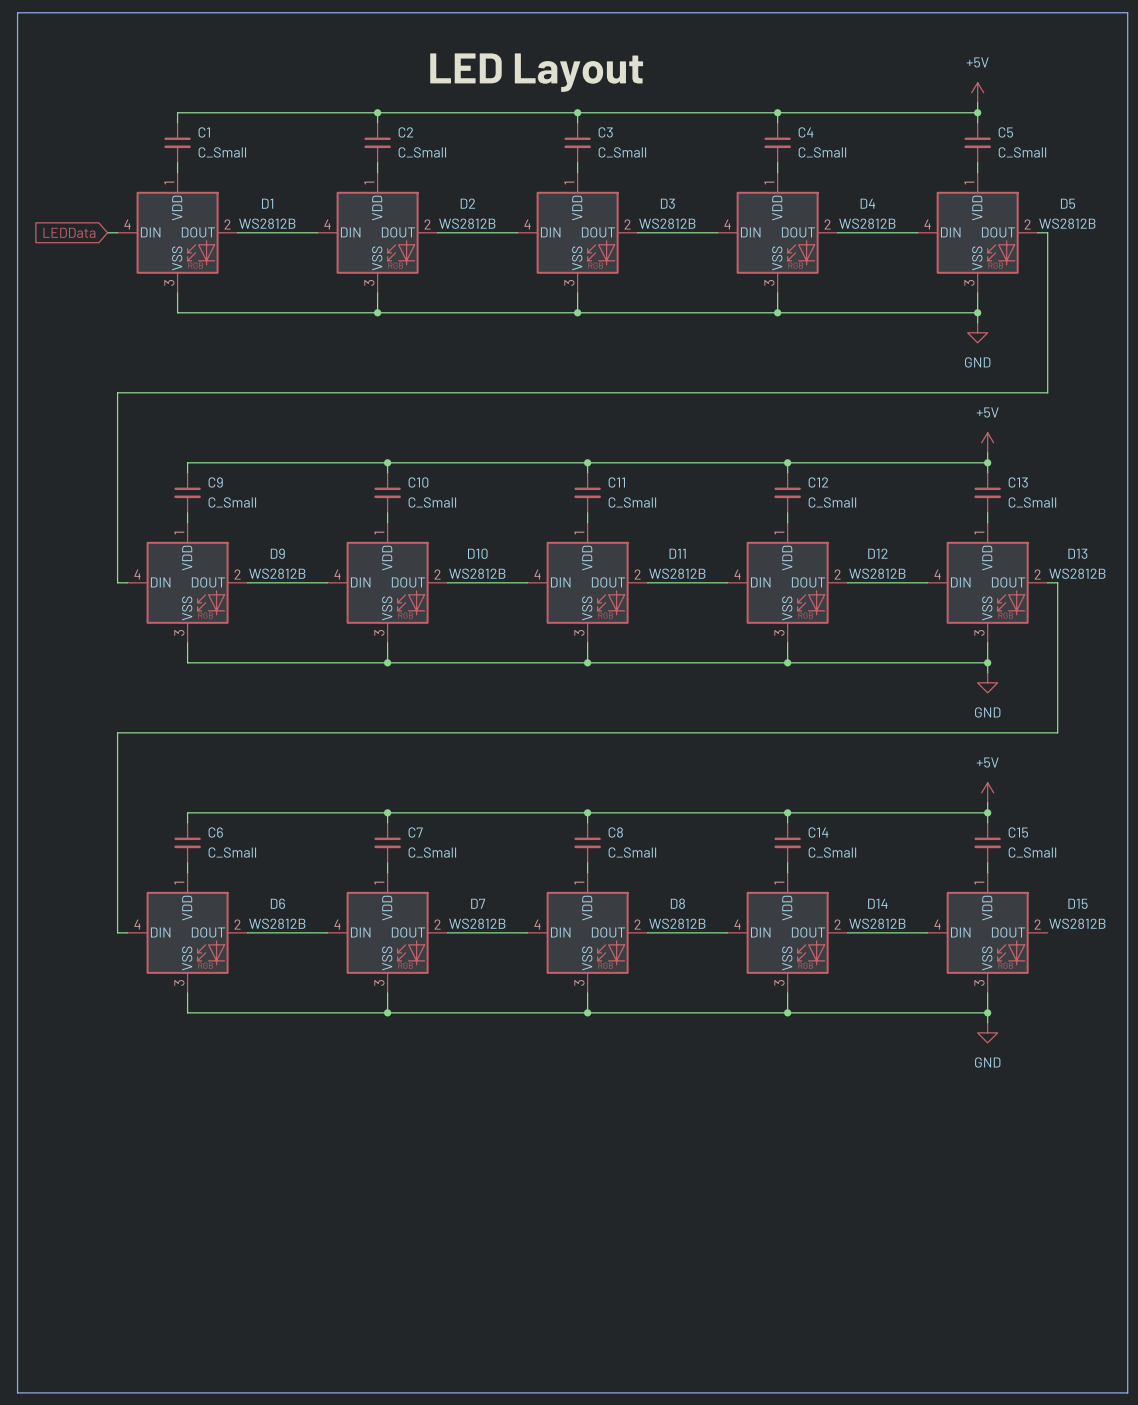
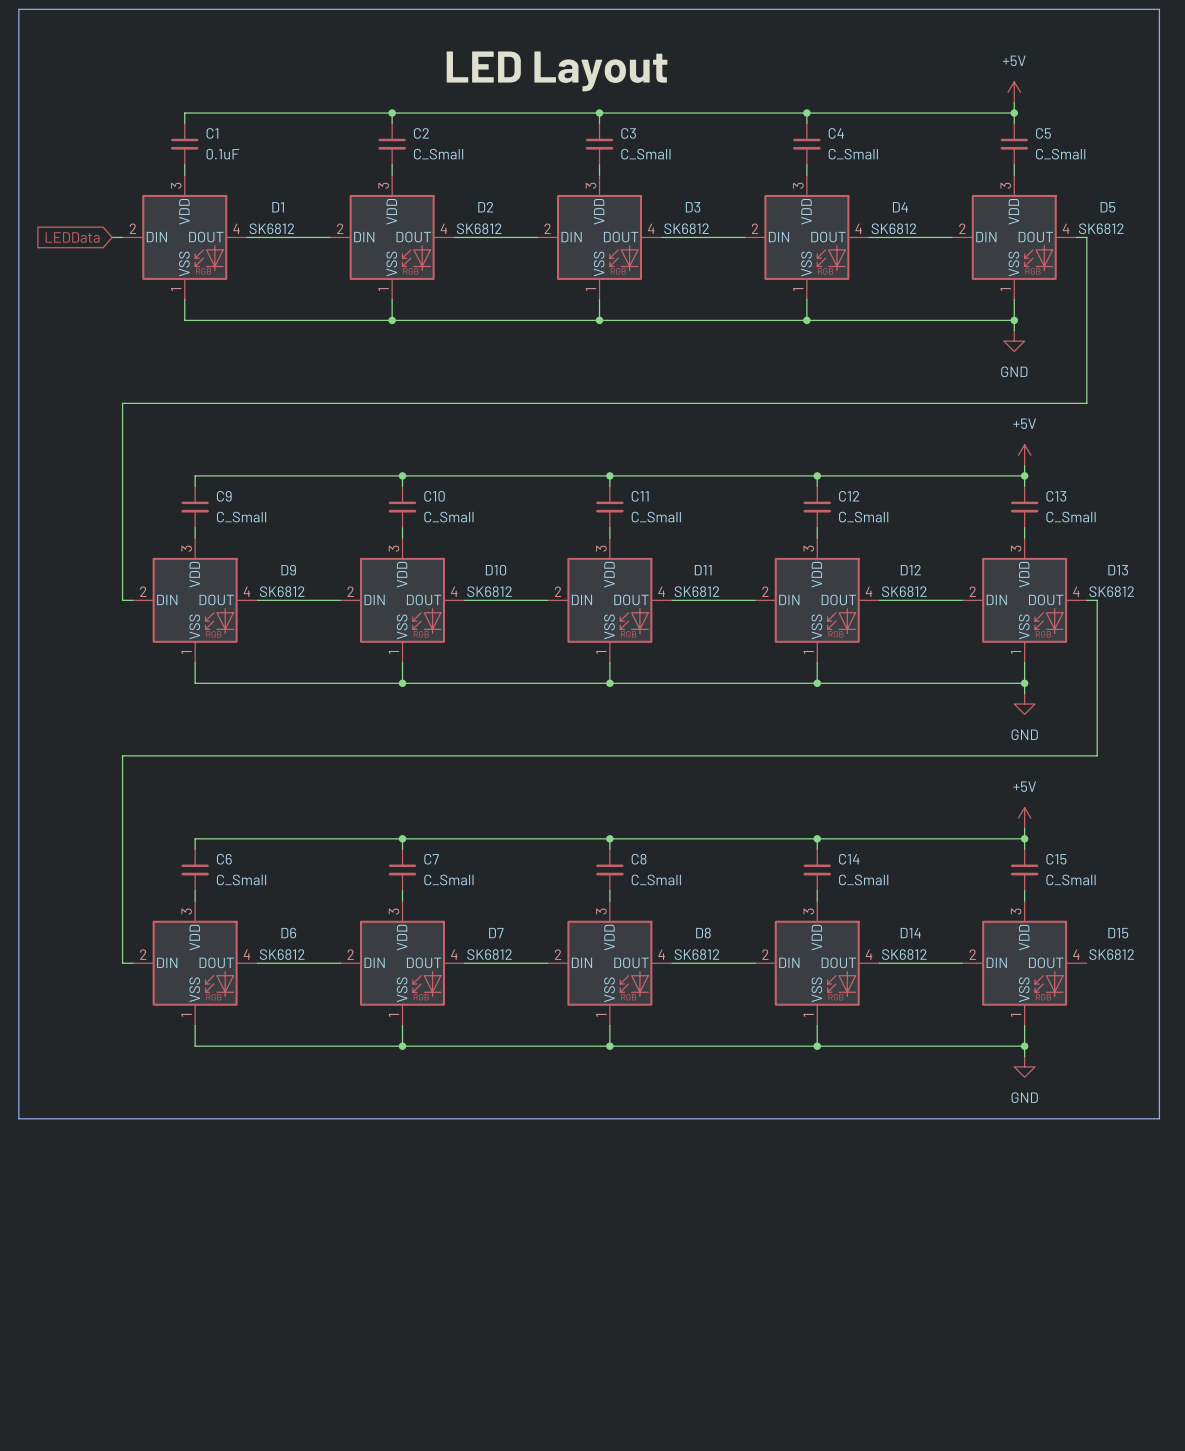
bus: (1117, 12) (1127, 12) (1127, 1392) (17, 1392) (17, 1082) -> (1159, 9) (1159, 1118) (18, 1118)
C1 value: C_Small (222, 152) -> 0.1uF (222, 154)
D1 pin number: 1 (169, 183) -> 3 (176, 185)
D2 pin number: 1 (369, 183) -> 3 (383, 185)
D3 pin number: 1 (569, 183) -> 3 (591, 185)
D4 pin number: 1 (769, 183) -> 3 (798, 185)
D5 pin number: 1 (969, 183) -> 3 (1005, 185)
D1 value: WS2812B (267, 223) -> SK6812 (271, 228)
D2 value: WS2812B (467, 223) -> SK6812 (479, 228)
D3 value: WS2812B (667, 223) -> SK6812 (686, 228)
D4 value: WS2812B (867, 223) -> SK6812 (893, 228)
D5 value: WS2812B (1067, 223) -> SK6812 (1101, 228)
D1 pin number: 4 (127, 224) -> 2 (132, 228)
D1 pin number: 2 (227, 224) -> 4 (236, 228)
D2 pin number: 4 (327, 224) -> 2 (340, 228)
D2 pin number: 2 (427, 224) -> 4 (443, 228)
D3 pin number: 4 (527, 224) -> 2 (547, 228)
D3 pin number: 2 (627, 224) -> 4 (651, 228)
D4 pin number: 4 (727, 224) -> 2 (755, 228)
D4 pin number: 2 (827, 224) -> 4 (858, 228)
D5 pin number: 4 (927, 224) -> 2 (962, 228)
D5 pin number: 2 (1027, 224) -> 4 (1066, 228)
D1 pin number: 3 (169, 282) -> 1 (176, 289)
D2 pin number: 3 (369, 282) -> 1 (383, 289)
D3 pin number: 3 (569, 282) -> 1 (590, 289)
D4 pin number: 3 (769, 282) -> 1 (798, 289)
D5 pin number: 3 (969, 282) -> 1 (1005, 289)
D9 pin number: 1 (179, 533) -> 3 (186, 548)
D10 pin number: 1 (379, 533) -> 3 (394, 548)
D11 pin number: 1 (579, 533) -> 3 (601, 548)
D12 pin number: 1 (779, 533) -> 3 (808, 548)
D13 pin number: 1 (979, 533) -> 3 (1016, 548)
D9 value: WS2812B (277, 573) -> SK6812 (282, 591)
D10 value: WS2812B (477, 573) -> SK6812 (489, 591)
D11 value: WS2812B (677, 573) -> SK6812 (696, 591)
D12 value: WS2812B (877, 573) -> SK6812 (904, 591)
D13 value: WS2812B (1077, 573) -> SK6812 (1111, 591)
D9 pin number: 4 (137, 574) -> 2 (143, 591)
D9 pin number: 2 (237, 574) -> 4 (246, 591)
D10 pin number: 4 (337, 574) -> 2 (350, 591)
D10 pin number: 2 (437, 574) -> 4 (454, 591)
D11 pin number: 4 (537, 574) -> 2 (558, 591)
D11 pin number: 2 (637, 574) -> 4 (661, 591)
D12 pin number: 4 (737, 574) -> 2 (765, 591)
D12 pin number: 2 (837, 574) -> 4 (869, 591)
D13 pin number: 4 (937, 574) -> 2 (972, 591)
D13 pin number: 2 (1037, 574) -> 4 (1076, 591)
D9 pin number: 3 (179, 632) -> 1 (186, 652)
D10 pin number: 3 (379, 632) -> 1 (393, 652)
D11 pin number: 3 (579, 632) -> 1 (601, 652)
D12 pin number: 3 (779, 632) -> 1 (808, 652)
D13 pin number: 3 (979, 632) -> 1 (1016, 652)
D6 pin number: 1 (179, 883) -> 3 (186, 911)
D7 pin number: 1 (379, 883) -> 3 (394, 911)
D8 pin number: 1 (579, 883) -> 3 (601, 911)
D14 pin number: 1 (779, 883) -> 3 (808, 911)
D15 pin number: 1 (979, 883) -> 3 (1016, 911)
D6 value: WS2812B (277, 923) -> SK6812 (282, 954)
D7 value: WS2812B (477, 923) -> SK6812 (489, 954)
D8 value: WS2812B (677, 923) -> SK6812 (696, 954)
D14 value: WS2812B (877, 923) -> SK6812 (904, 954)
D15 value: WS2812B (1077, 923) -> SK6812 (1111, 954)
D6 pin number: 4 (137, 924) -> 2 (143, 954)
D6 pin number: 2 (237, 924) -> 4 (246, 954)
D7 pin number: 4 (337, 924) -> 2 (350, 954)
D7 pin number: 2 (437, 924) -> 4 (454, 954)
D8 pin number: 4 (537, 924) -> 2 (558, 954)
D8 pin number: 2 (637, 924) -> 4 (661, 954)
D14 pin number: 4 (737, 924) -> 2 (765, 954)
D14 pin number: 2 (837, 924) -> 4 (869, 954)
D15 pin number: 4 (937, 924) -> 2 (972, 954)
D15 pin number: 2 (1037, 924) -> 4 (1076, 954)
D6 pin number: 3 (179, 982) -> 1 (186, 1015)
D7 pin number: 3 (379, 982) -> 1 (393, 1015)
D8 pin number: 3 (579, 982) -> 1 (601, 1015)
D14 pin number: 3 (779, 982) -> 1 (808, 1015)
D15 pin number: 3 (979, 982) -> 1 (1016, 1015)

